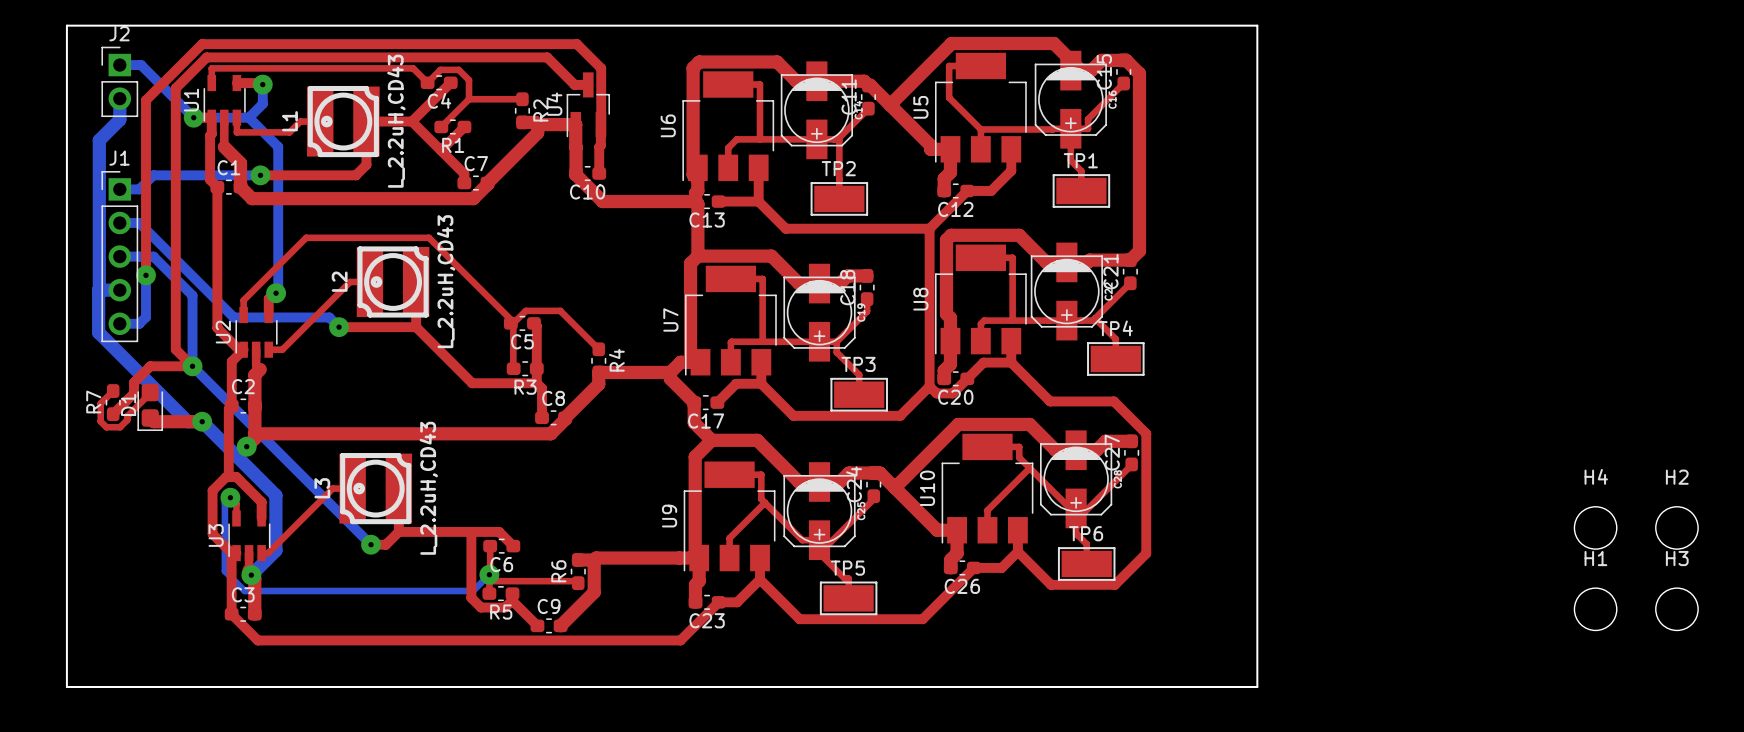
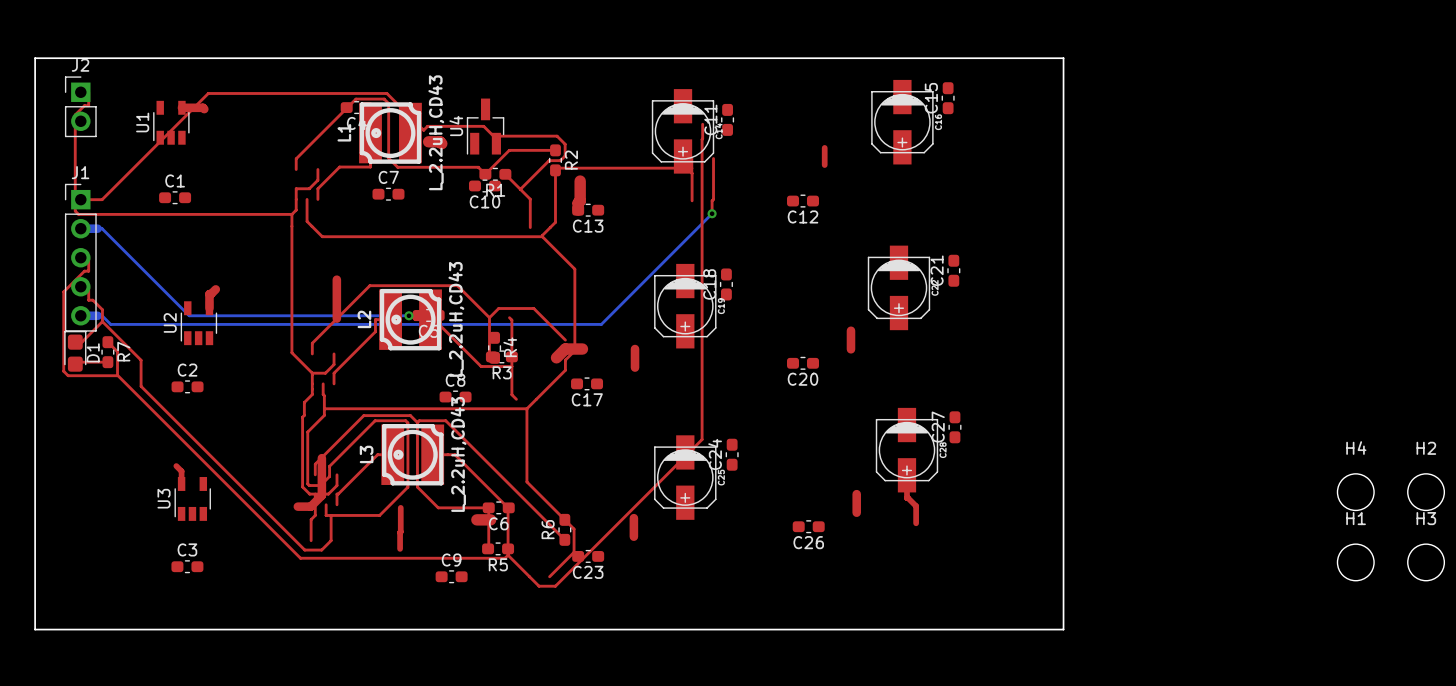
bottom track: (119, 65) (141, 65) (193, 117) (249, 117) -> none
top track: none -> (88, 92) (88, 105) (84, 105) (75, 114) (75, 211) (78, 214) (291, 214)
top track: (980, 65) (949, 65) (949, 97) (980, 129) (1088, 128) (1088, 119) (1123, 83) -> none
top track: (1070, 70) (1091, 70) (1101, 60) (1126, 60) (1139, 73) (1139, 250) (1130, 260) (1046, 262) (1019, 235) (951, 235) (946, 239) (946, 313) (950, 317) (950, 364) (944, 370) (944, 378) -> none
top track: (1081, 70) (1053, 43) (951, 43) (890, 104) -> none
top track: (450, 82) (412, 121) -> none
top track: (211, 83) (211, 68) (413, 68) (427, 82) (440, 69) (458, 69) (469, 80) (469, 99) -> none
bottom track: (262, 84) (262, 103) (249, 117) -> none
via: (262, 84) -> none
top track: (588, 84) (574, 84) (547, 57) (206, 57) (175, 88) (175, 349) (192, 366) (150, 366) (134, 382) (134, 393) (113, 414) -> none
top track: (728, 84) (760, 84) (760, 139) -> none
bottom track: (119, 98) (119, 119) (99, 140) (99, 290) -> none
top track: (469, 99) (441, 126) -> none
top track: (469, 99) (522, 99) -> none
top track: none -> (702, 124) (702, 439) (555, 586) (539, 586) (508, 555)
U5: (980, 107) -> none
top track: (868, 108) (839, 137) (839, 198) -> none
R2 position: (522, 110) -> (555, 160)
top track: none -> (370, 133) (370, 167) (339, 167) (317, 188) (317, 199)
top track: (193, 117) (211, 117) (210, 179) (217, 187) (217, 328) (241, 352) -> none
via: (193, 117) -> none
top track: (224, 117) (224, 147) (240, 163) (240, 187) (252, 198) (473, 198) (537, 132) (537, 124) (575, 124) (576, 173) -> none
top track: (236, 117) (236, 132) (289, 132) (300, 121) (320, 121) -> none
bottom track: (249, 117) (278, 146) (278, 291) (276, 293) -> none
L1 position: (343, 121) -> (390, 133)
top track: (412, 121) (366, 121) (366, 164) (355, 175) (260, 175) -> none
top track: (412, 121) (464, 173) (464, 183) -> none
top track: (600, 124) (599, 173) -> none
R1 position: (452, 126) -> (495, 174)
top track: (464, 126) (440, 150) -> none
U6: (728, 126) -> none
top track: (1070, 128) (1070, 160) (1081, 171) (1081, 190) -> none
top track: none -> (555, 150) (509, 150) (485, 174) (478, 167) (397, 167) (388, 158) (388, 103) (384, 99) (355, 99) (296, 158) (296, 169)
top track: (600, 135) (601, 68) (576, 44) (202, 44) (146, 100) (146, 275) -> none
top track: (839, 139) (736, 139) (728, 148) (728, 167) -> none
top track: none -> (691, 158) (692, 200)
top track: none -> (713, 158) (712, 213)
top track: (1011, 149) (1011, 170) (991, 190) (967, 190) (929, 228) -> none
top track: none -> (691, 168) (557, 168) (555, 170) (555, 222) (542, 236)
top track: none -> (317, 169) (317, 180) (309, 188) (296, 188) (296, 210) (291, 214)
top track: none -> (505, 174) (530, 199) (530, 227)
top track: (758, 167) (758, 201) -> none
top track: (576, 173) (602, 201) (695, 201) (697, 203) (697, 256) -> none
bottom track: (260, 175) (153, 175) (139, 189) (119, 189) -> none
via: (260, 175) -> none
top track: none -> (520, 189) (549, 160) (560, 160) (565, 155) (565, 144) (557, 136) (493, 136) (483, 126) (427, 126) (423, 130) (386, 93) (208, 93) (102, 199) (88, 199)
top track: (697, 179) (693, 174) (693, 68) (699, 62) (777, 62) (796, 81) (864, 81) (870, 85) (930, 145) (930, 149) (950, 149) (950, 172) (944, 178) (944, 190) -> none
top track: none -> (307, 199) (307, 221) (322, 236) (542, 236)
TP1: (1081, 190) -> none
TP2: (839, 198) -> none
top track: (718, 201) (758, 201) -> none
top track: (758, 201) (785, 228) (929, 228) -> none
via: none -> (712, 213)
top track: none -> (291, 214) (291, 352) (312, 373)
bottom track: (139, 222) (233, 317) (329, 317) (339, 327) -> (97, 228) (102, 228) (189, 315) (408, 315)
top track: (929, 228) (929, 386) -> none
top track: none -> (542, 236) (574, 269) (574, 350) (565, 360) (565, 370) (526, 408)
bottom track: (119, 256) (153, 256) (192, 295) (192, 366) (371, 544) -> none
top track: none -> (88, 257) (88, 271) (84, 271) (63, 291) (63, 371) (68, 375) (117, 375)
top track: (697, 256) (690, 263) (690, 362) -> none
top track: (697, 256) (771, 256) (799, 283) (840, 283) (847, 275) (867, 275) -> none
top track: (980, 257) (1012, 257) (1012, 320) -> none
bottom track: (146, 275) (146, 317) (139, 323) -> (712, 213) (601, 324) (110, 324) (102, 315) (97, 315)
via: (146, 275) -> none
top track: (730, 278) (762, 278) (762, 341) -> none
top track: (369, 281) (350, 281) (282, 349) (268, 349) -> none
L2 position: (393, 281) -> (410, 319)
top track: (1130, 283) (1092, 320) (984, 320) (980, 323) (980, 341) -> none
bottom track: (119, 290) (98, 290) (98, 332) (187, 421) (202, 421) (275, 495) (275, 550) (251, 575) -> none
top track: none -> (88, 286) (88, 300) (92, 300) (102, 309) (102, 321)
via: (276, 293) -> none
top track: (867, 299) (867, 311) (836, 341) -> none
U8: (980, 299) -> none
top track: (243, 315) (243, 300) (306, 237) (429, 237) (510, 319) (510, 323) (513, 323) -> none
top track: (1095, 318) (1115, 339) (1115, 358) -> none
U7: (730, 320) -> none
top track: none -> (408, 315) (415, 319) (434, 319) (481, 366) (511, 366)
via: none -> (408, 315)
top track: (513, 323) (513, 368) -> none
top track: (513, 323) (525, 310) (560, 310) (598, 349) -> none
top track: (534, 323) (536, 326) (536, 383) -> none
top track: none -> (489, 317) (457, 285) (369, 285) (312, 343) (312, 353)
top track: none -> (489, 317) (498, 308) (533, 308) (565, 340)
top track: none -> (489, 317) (489, 354) (491, 356)
top track: none -> (509, 317) (511, 320) (511, 394) (516, 399)
top track: (339, 327) (416, 327) (472, 383) (536, 383) -> none
via: (339, 327) -> none
top track: none -> (390, 319) (375, 319) (375, 331) (334, 373) (334, 383)
top track: none -> (102, 321) (141, 360) (141, 386) (304, 550) (321, 550) (331, 540) (331, 515)
top track: none -> (102, 321) (81, 342) (75, 342)
top track: (836, 341) (731, 341) (730, 362) -> none
top track: (836, 341) (836, 352) (859, 374) (859, 394) -> none
top track: (243, 349) (231, 361) (231, 406) (228, 409) (228, 477) -> none
top track: (256, 349) (256, 365) (260, 369) (254, 374) (254, 438) (246, 446) -> none
top track: none -> (107, 342) (117, 351) (117, 375)
TP4: (1115, 358) -> none
via: (192, 366) -> none
top track: none -> (334, 353) (334, 364) (325, 373) (312, 373)
R3 position: (525, 368) -> (501, 356)
top track: none -> (107, 362) (77, 362) (75, 364)
top track: (536, 383) (542, 388) (542, 417) -> none
top track: (929, 386) (936, 393) (952, 393) (983, 362) (1011, 362) (1050, 401) (1114, 401) (1146, 433) (1146, 553) (1115, 584) (1050, 584) (1017, 551) (1001, 567) (973, 567) (922, 619) (799, 619) (760, 579) (737, 602) (718, 602) (680, 640) (257, 640) (231, 614) (231, 553) -> none
top track: (929, 386) (900, 415) (793, 415) (761, 383) (736, 383) (717, 402) -> none
top track: none -> (312, 373) (312, 394) (304, 402) (304, 415) (302, 417) (302, 486) (309, 494) (328, 494) (337, 485) (337, 474)
top track: (113, 391) (100, 403) (100, 421) (106, 427) (120, 427) (127, 420) (127, 416) (150, 392) -> none
top track: none -> (117, 375) (300, 558) (505, 558) (508, 555)
TP3: (859, 394) -> none
R7 name position: R7 (93, 401) -> R7 (123, 351)
R7 position: (113, 402) -> (107, 352)
top track: none -> (323, 383) (324, 415) (307, 432) (307, 483) (309, 485) (320, 485) (329, 476) (329, 466) (375, 420) (405, 420) (407, 422) (407, 487) (379, 515) (326, 515) (326, 504)
D1 rotation: 0° (150, 407) -> 180° (75, 351)
D1 position: (150, 407) -> (75, 351)
top track: (150, 417) (153, 421) (202, 421) -> none
via: (202, 421) -> none
top track: none -> (324, 408) (526, 408)
top track: none -> (526, 408) (526, 481) (574, 529) (574, 552) (549, 576)
top track: (254, 433) (550, 433) (598, 384) (598, 372) (670, 372) (670, 378) (694, 402) (694, 422) (711, 440) -> none
top track: (711, 440) (695, 456) (695, 558) -> none
top track: (711, 440) (757, 440) (799, 481) (840, 481) (848, 473) (880, 473) (937, 530) (957, 530) (957, 553) (950, 559) (950, 567) -> none
top track: (1131, 441) (1105, 441) (1096, 450) (1055, 450) (1029, 424) (958, 424) (894, 487) -> none
via: (246, 446) -> none
top track: (987, 446) (1019, 446) (1019, 457) (1076, 514) -> none
top track: none -> (417, 422) (410, 415) (363, 415) (315, 464) (315, 474)
top track: none -> (417, 422) (419, 420) (445, 420) (564, 539)
top track: none -> (417, 422) (417, 487) (438, 507) (488, 507) (488, 548)
top track: (1131, 464) (1076, 520) -> none
top track: (1029, 468) (987, 510) (987, 530) -> none
top track: (729, 474) (761, 474) (761, 499) (764, 502) -> none
top track: none -> (392, 454) (377, 454) (337, 494) (337, 504)
top track: none -> (432, 454) (454, 454) (508, 507)
top track: (352, 488) (332, 488) (268, 553) (261, 553) -> none
L3 position: (375, 488) -> (412, 454)
U10: (987, 488) -> none
top track: (873, 496) (873, 499) (819, 553) -> none
bottom track: (230, 497) (224, 503) (224, 571) (244, 591) (473, 591) (489, 574) -> none
via: (230, 497) -> none
top track: (764, 502) (802, 540) (819, 540) (819, 553) -> none
top track: (764, 502) (729, 538) (729, 558) -> none
U9: (729, 516) -> none
top track: (261, 518) (261, 502) (236, 477) (226, 477) (212, 490) (212, 534) (231, 553) (236, 553) -> none
top track: none -> (315, 494) (315, 515) (311, 519) (311, 540)
top track: (398, 531) (499, 531) (513, 546) -> none
top track: (471, 531) (471, 597) (480, 607) (505, 607) (512, 600) -> none
via: (371, 544) -> none
C6 position: (501, 546) -> (498, 507)
top track: none -> (508, 507) (508, 555)
top track: (249, 553) (249, 572) (254, 578) (254, 614) -> none
top track: (819, 553) (844, 578) (848, 578) (848, 598) -> none
TP6: (1086, 563) -> none
R6 position: (578, 571) -> (564, 529)
via: (489, 574) -> none
via: (251, 575) -> none
top track: (489, 581) (576, 581) (578, 583) -> none
R5 position: (500, 593) -> (498, 548)
TP5: (848, 598) -> none
top track: (512, 600) (537, 625) -> none
top track: (695, 602) (695, 584) (699, 581) (699, 558) (596, 558) (594, 560) (594, 592) (560, 625) -> none

